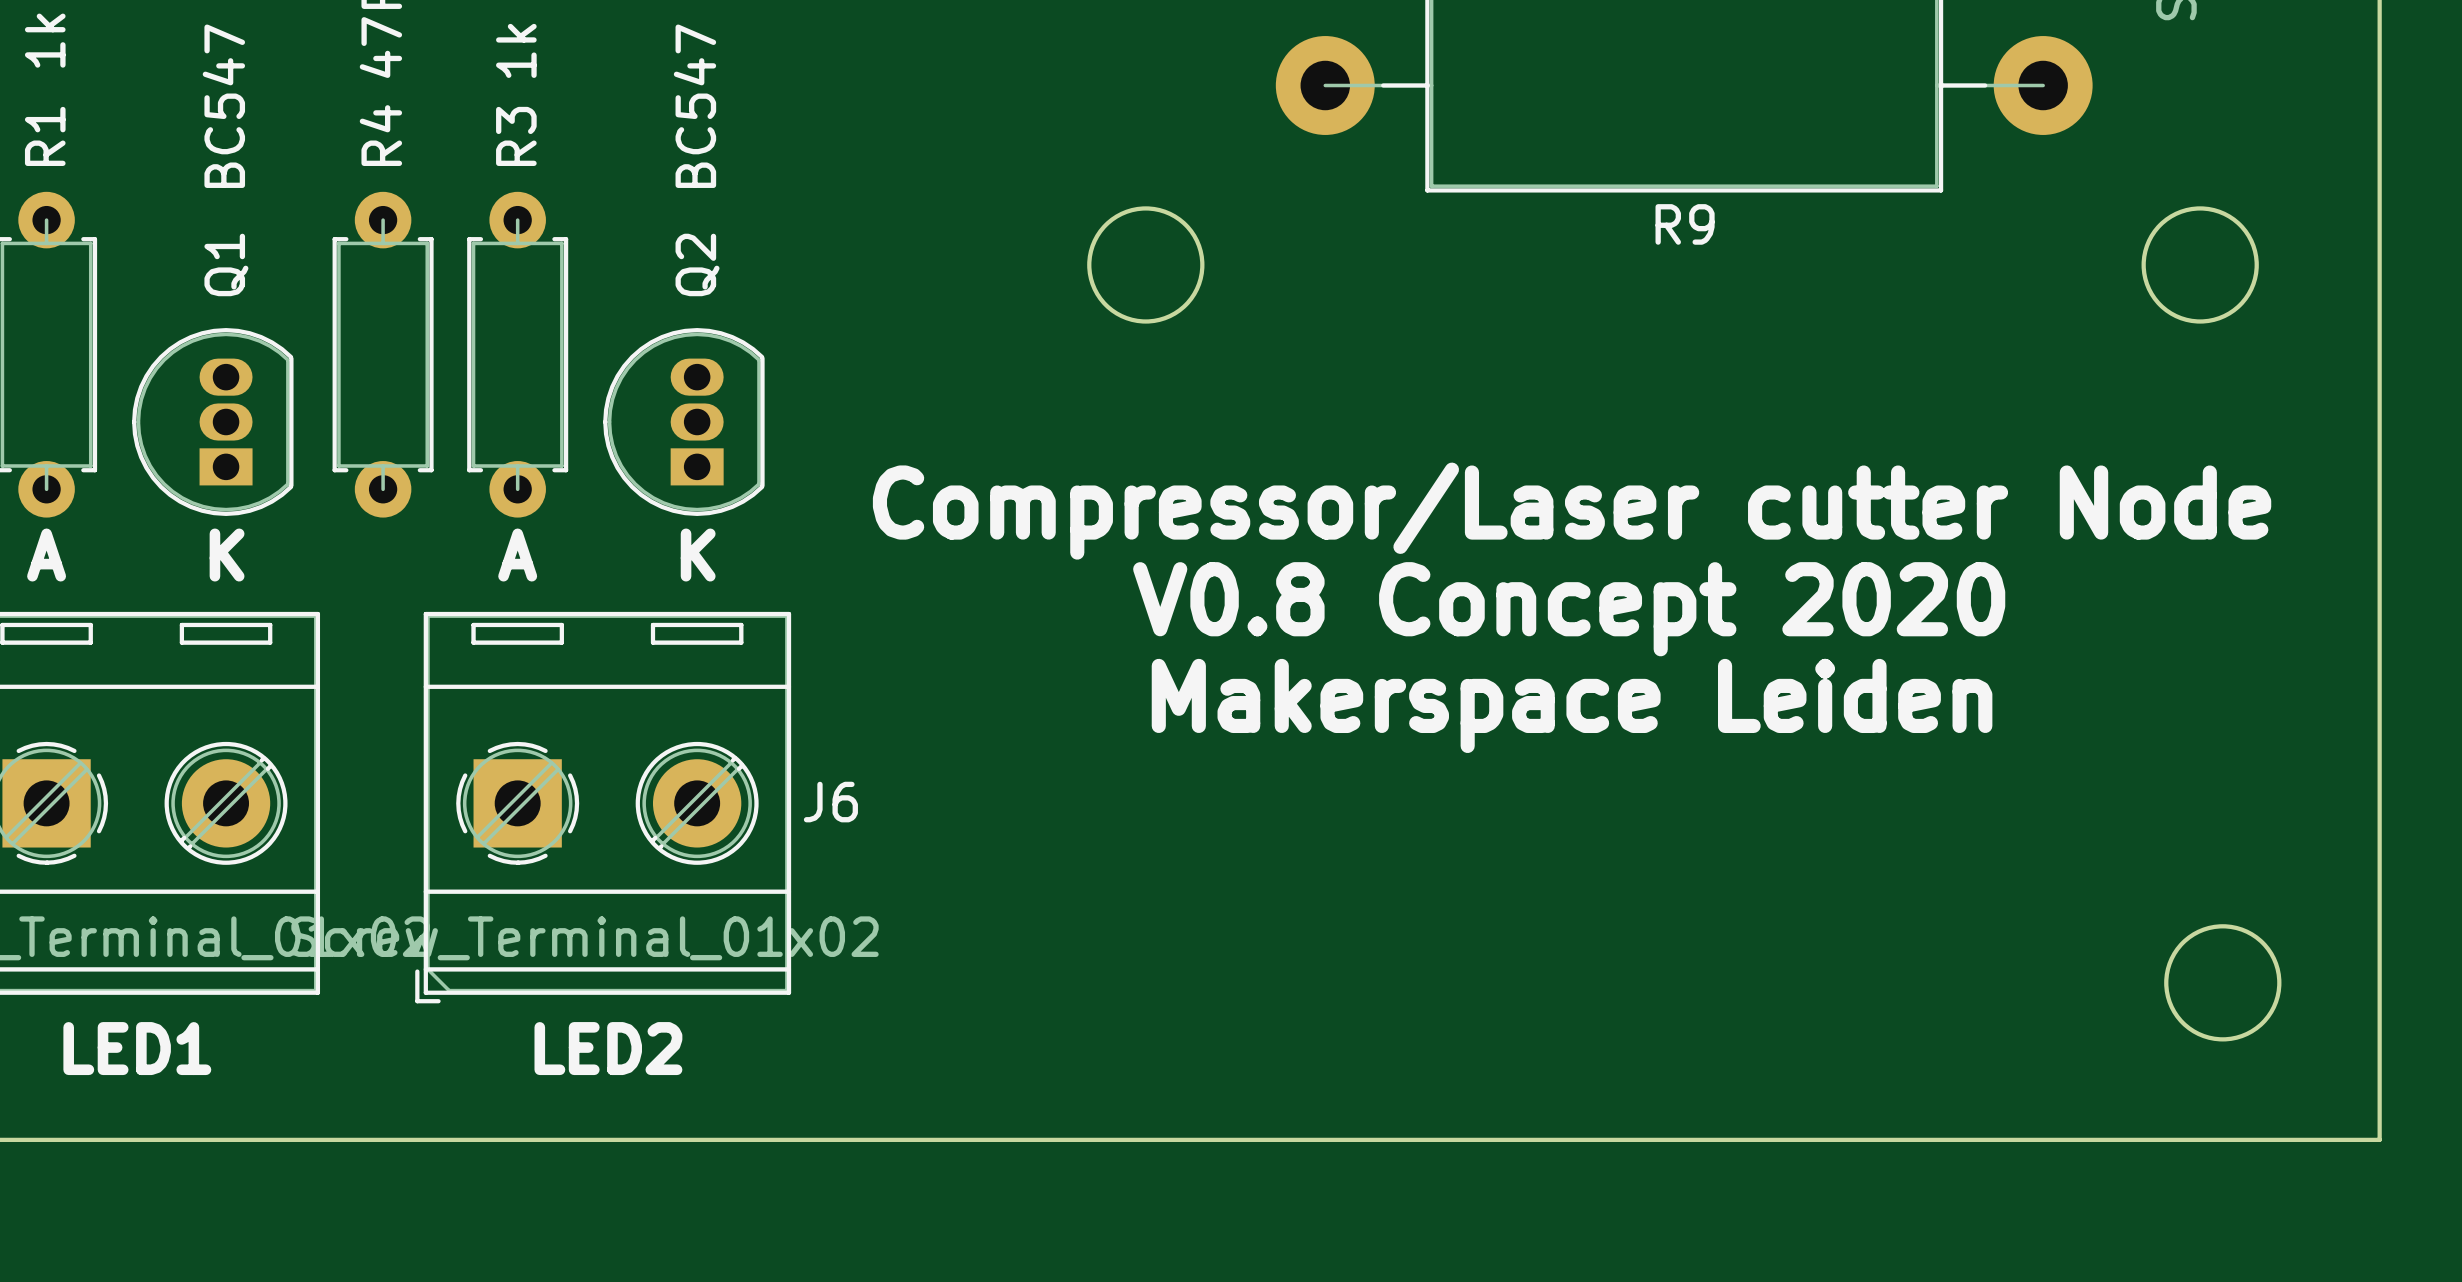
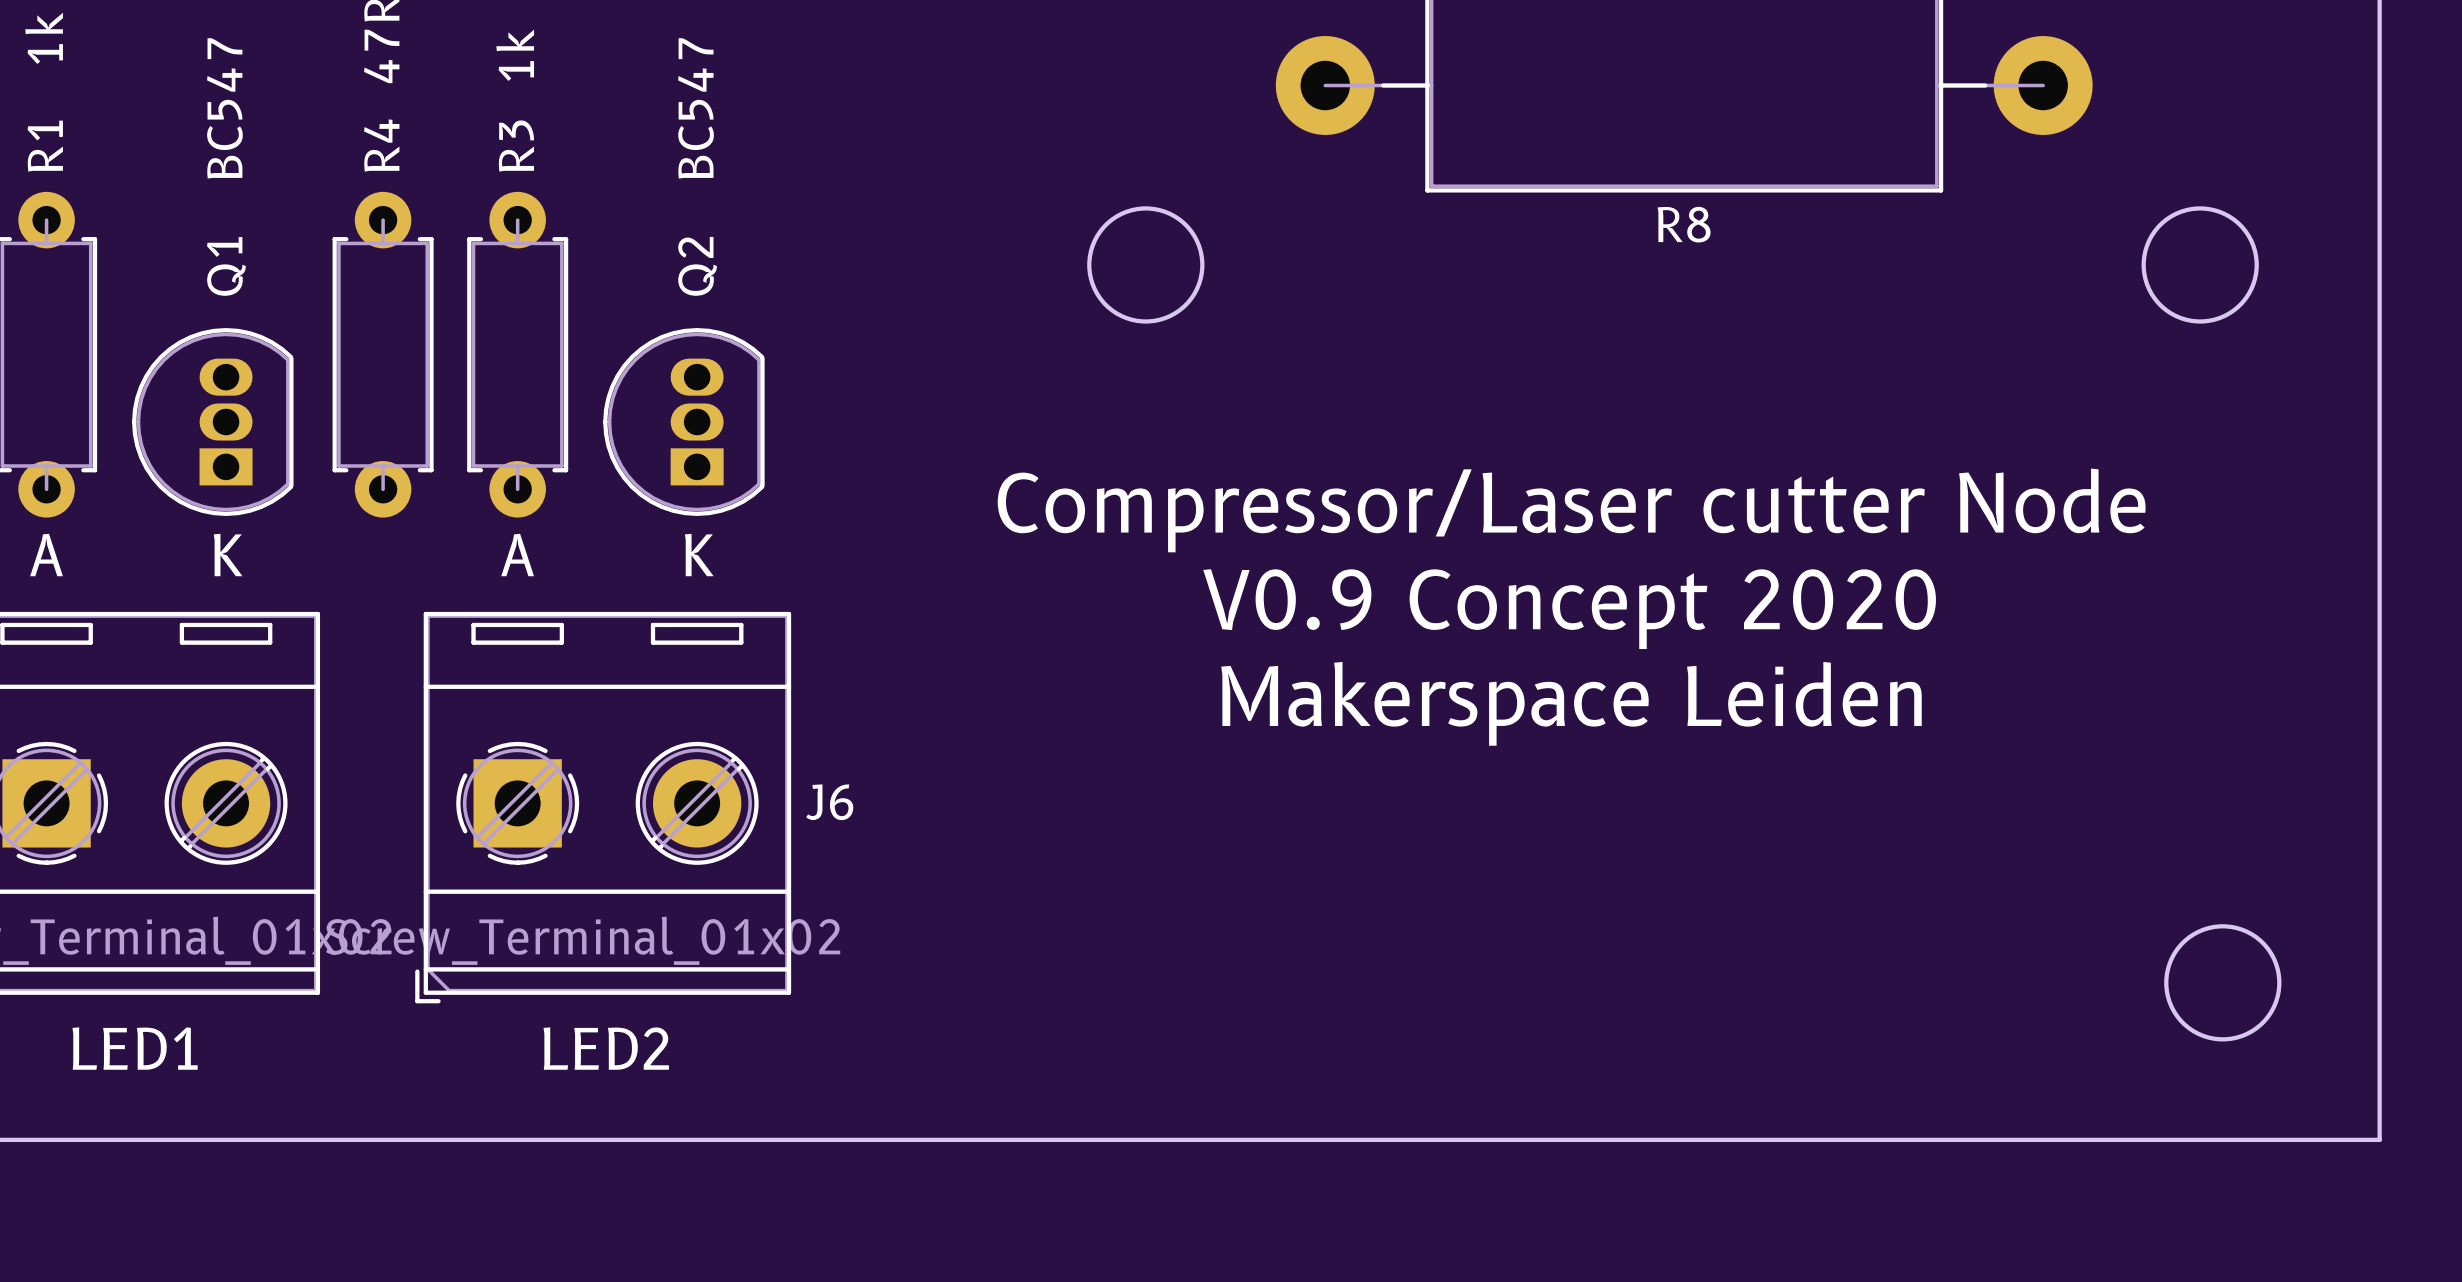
R9 name: R9 (1685, 224) -> R8 (1684, 224)
text: V0.8 Concept 2020 (1569, 609) -> V0.9 Concept 2020 (1569, 609)

